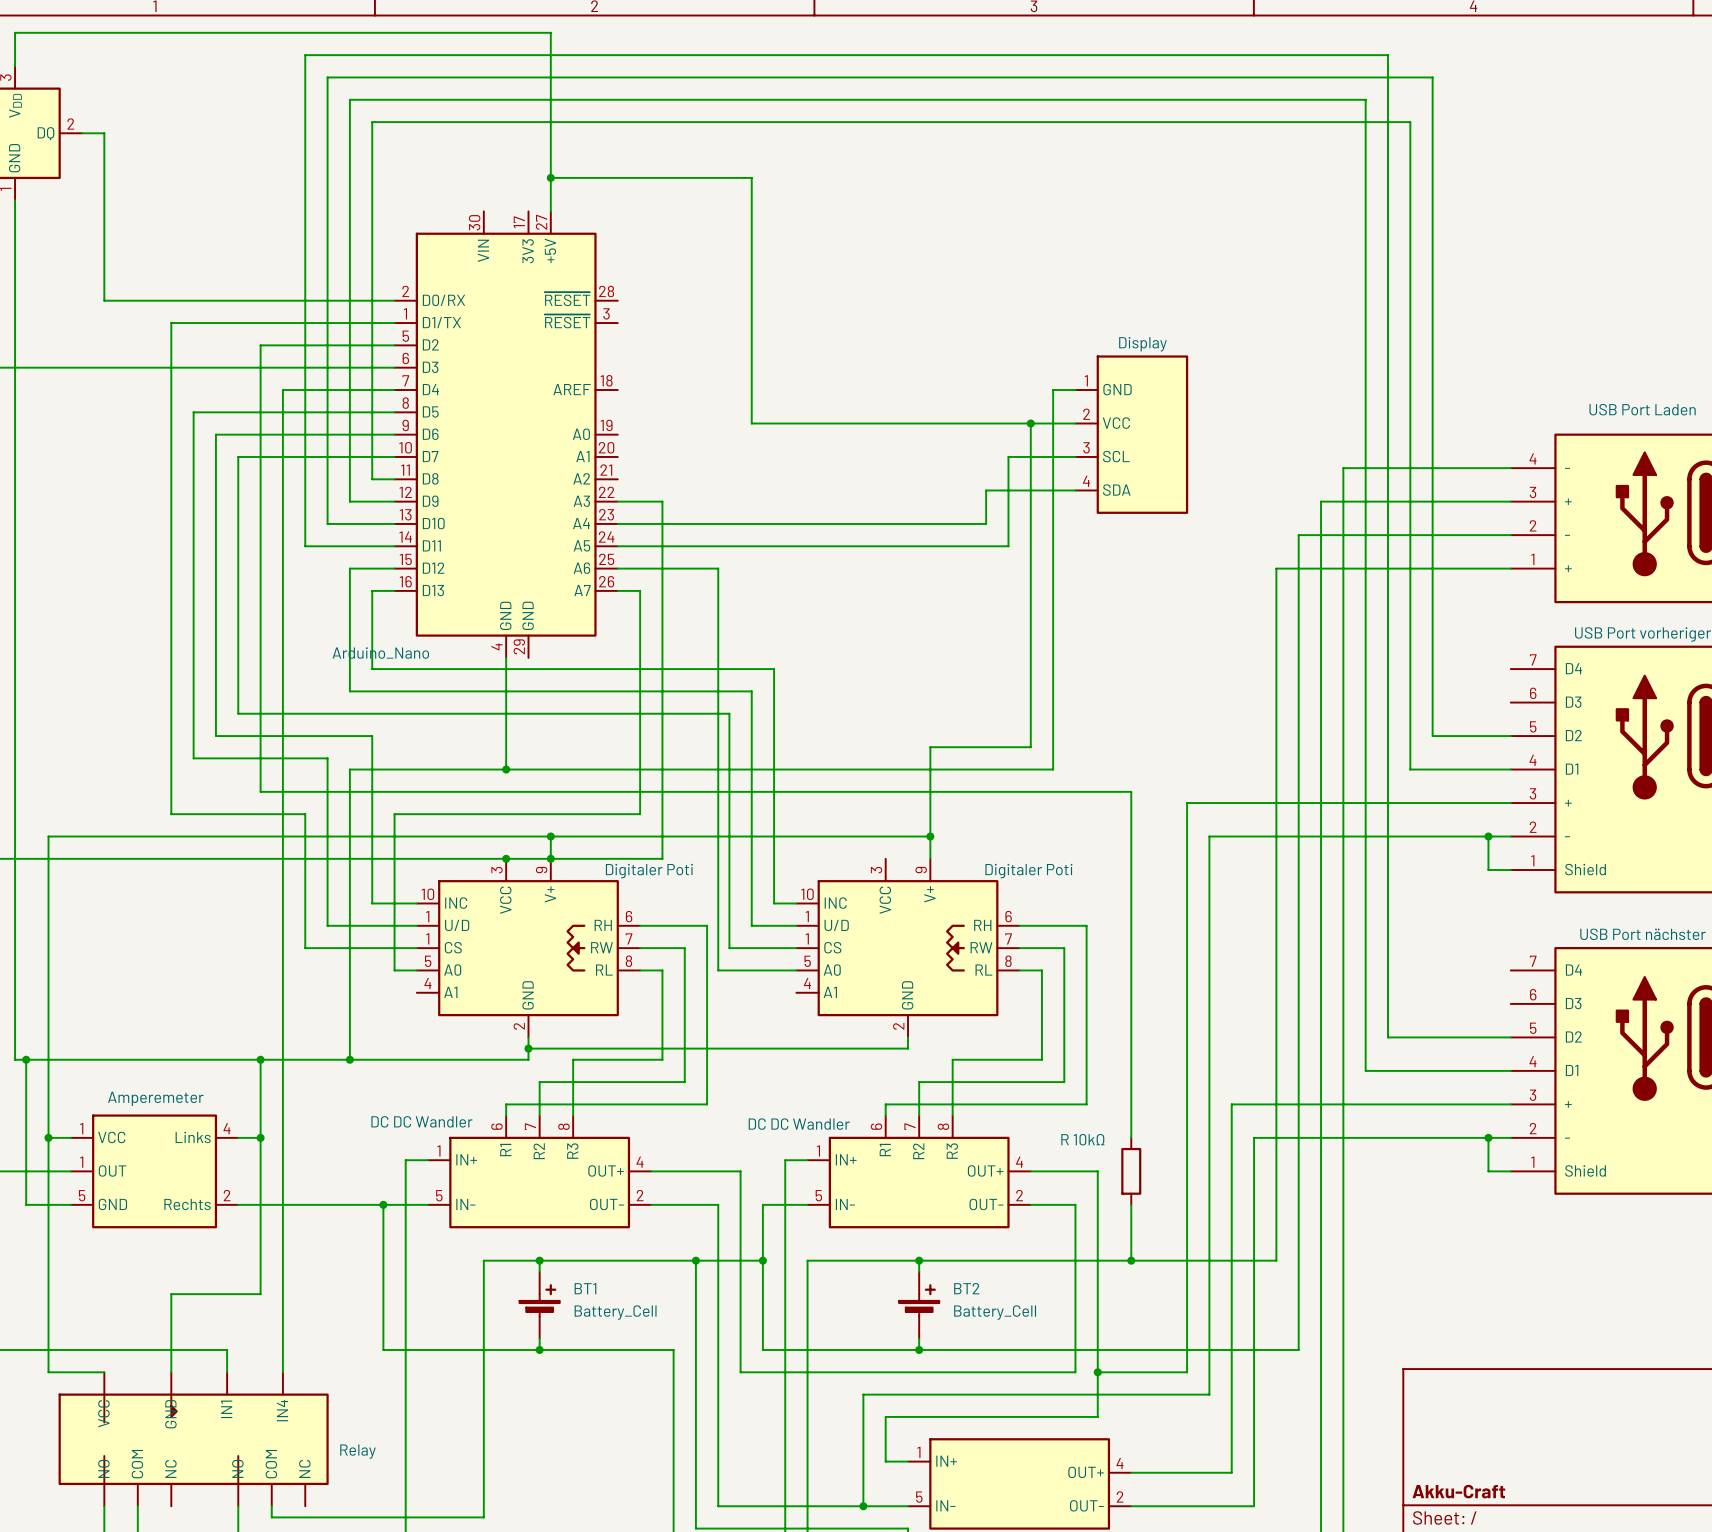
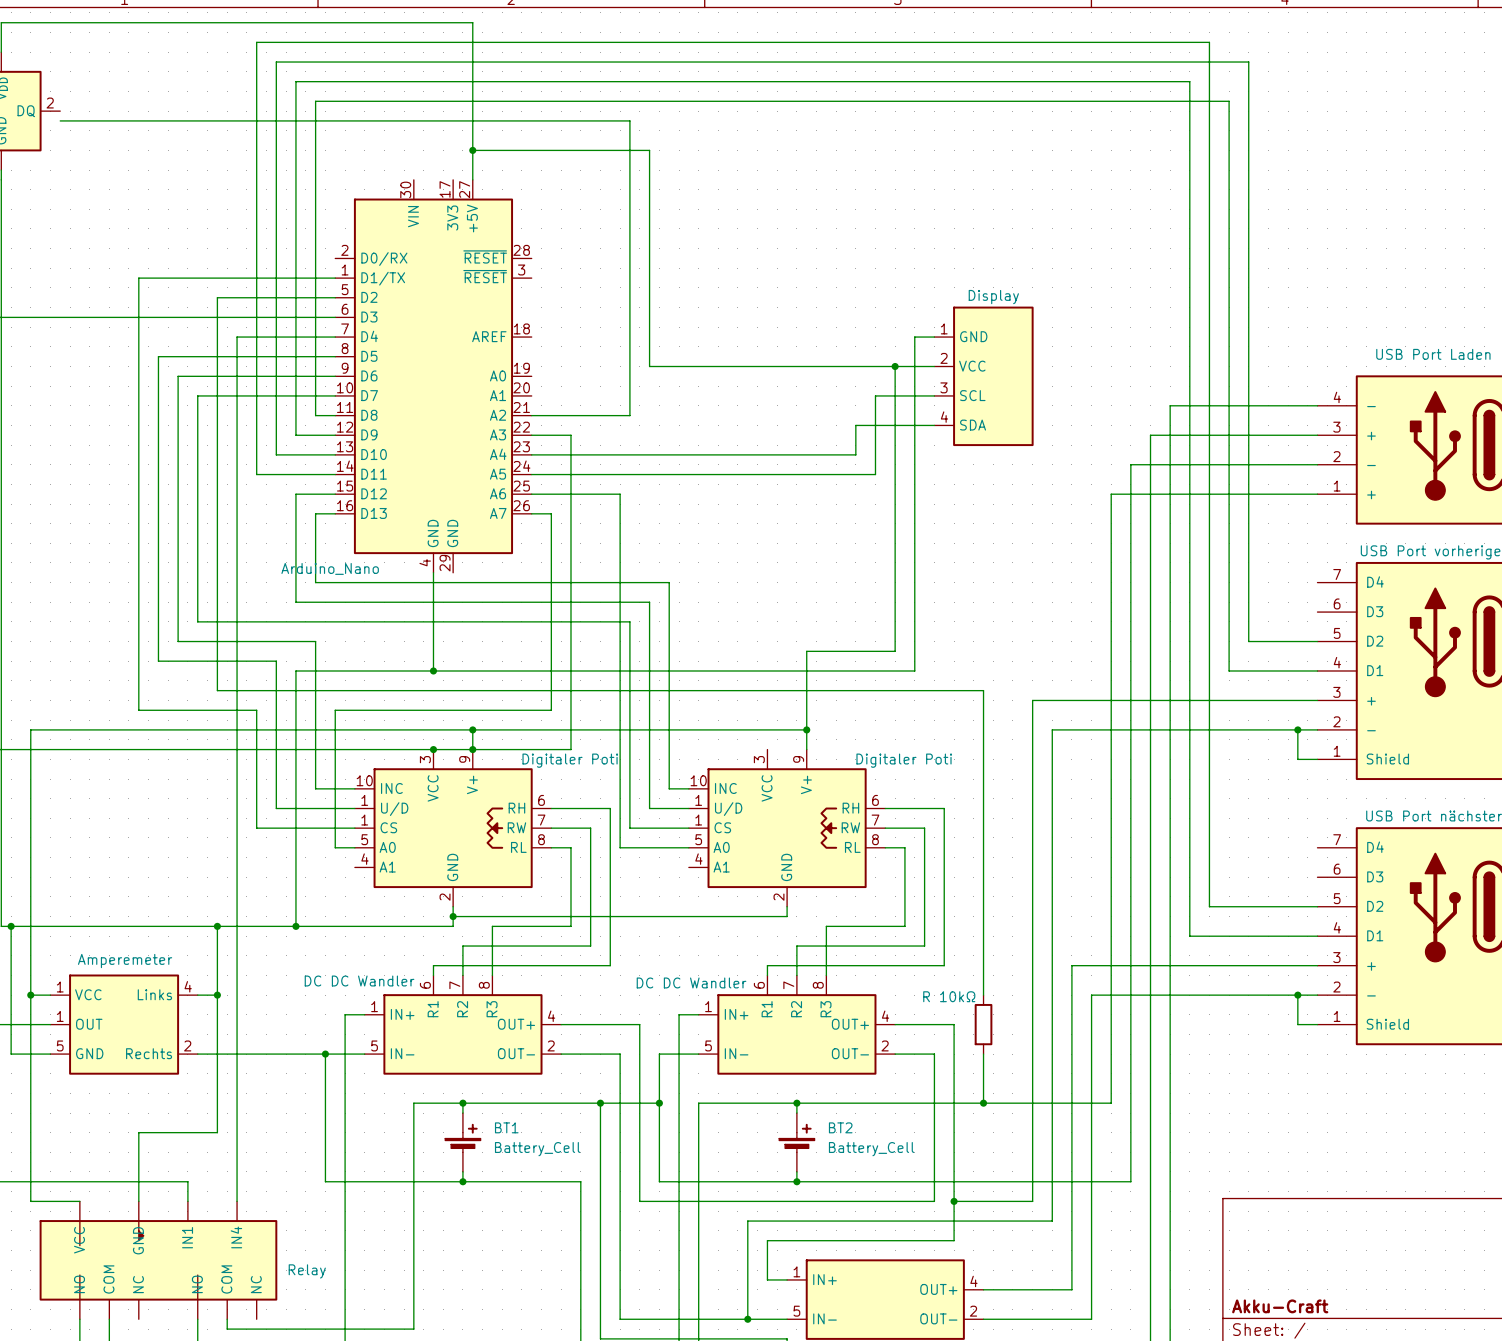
wire: (82, 133) (104, 133) (104, 300) (394, 300) -> none
wire: none -> (60, 120) (629, 120) (629, 415) (531, 415)

